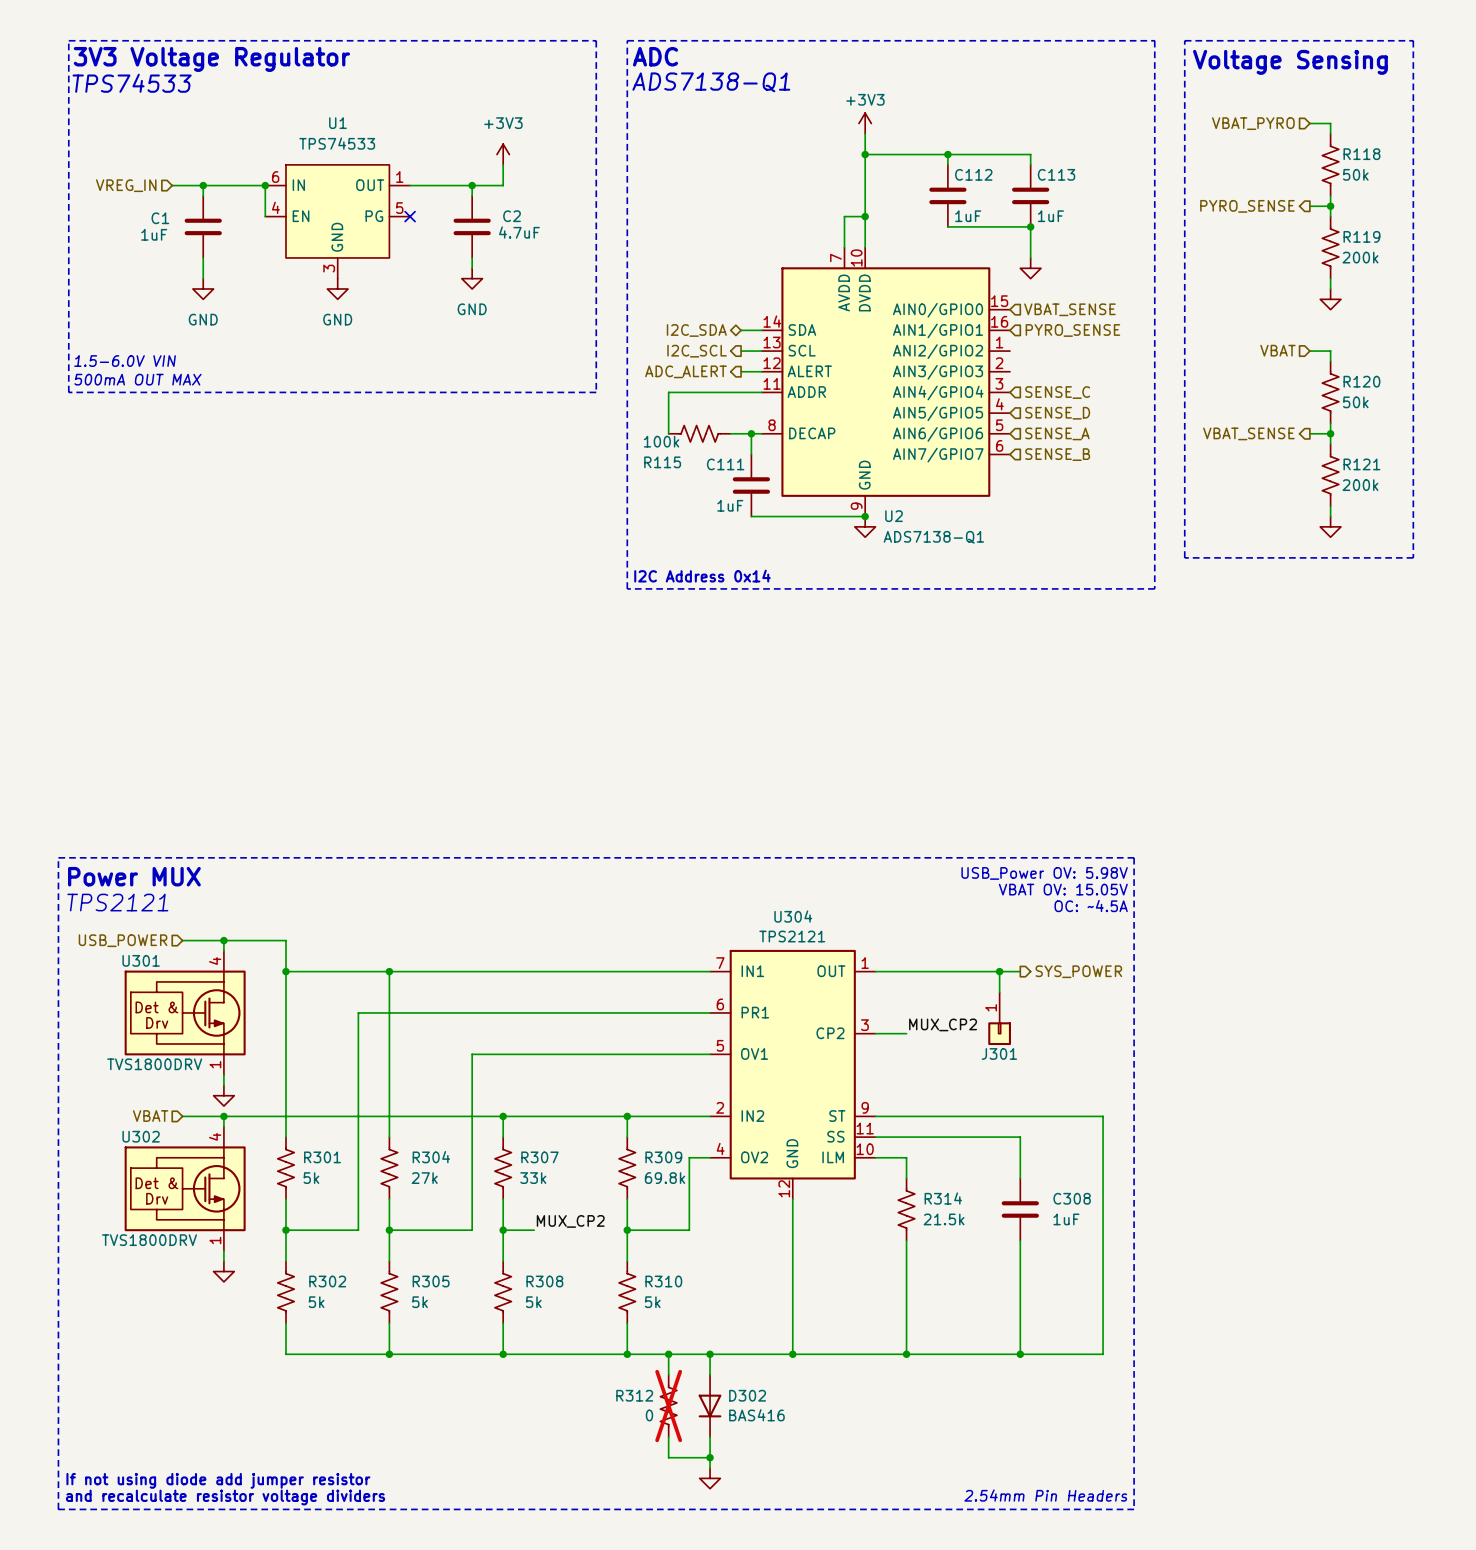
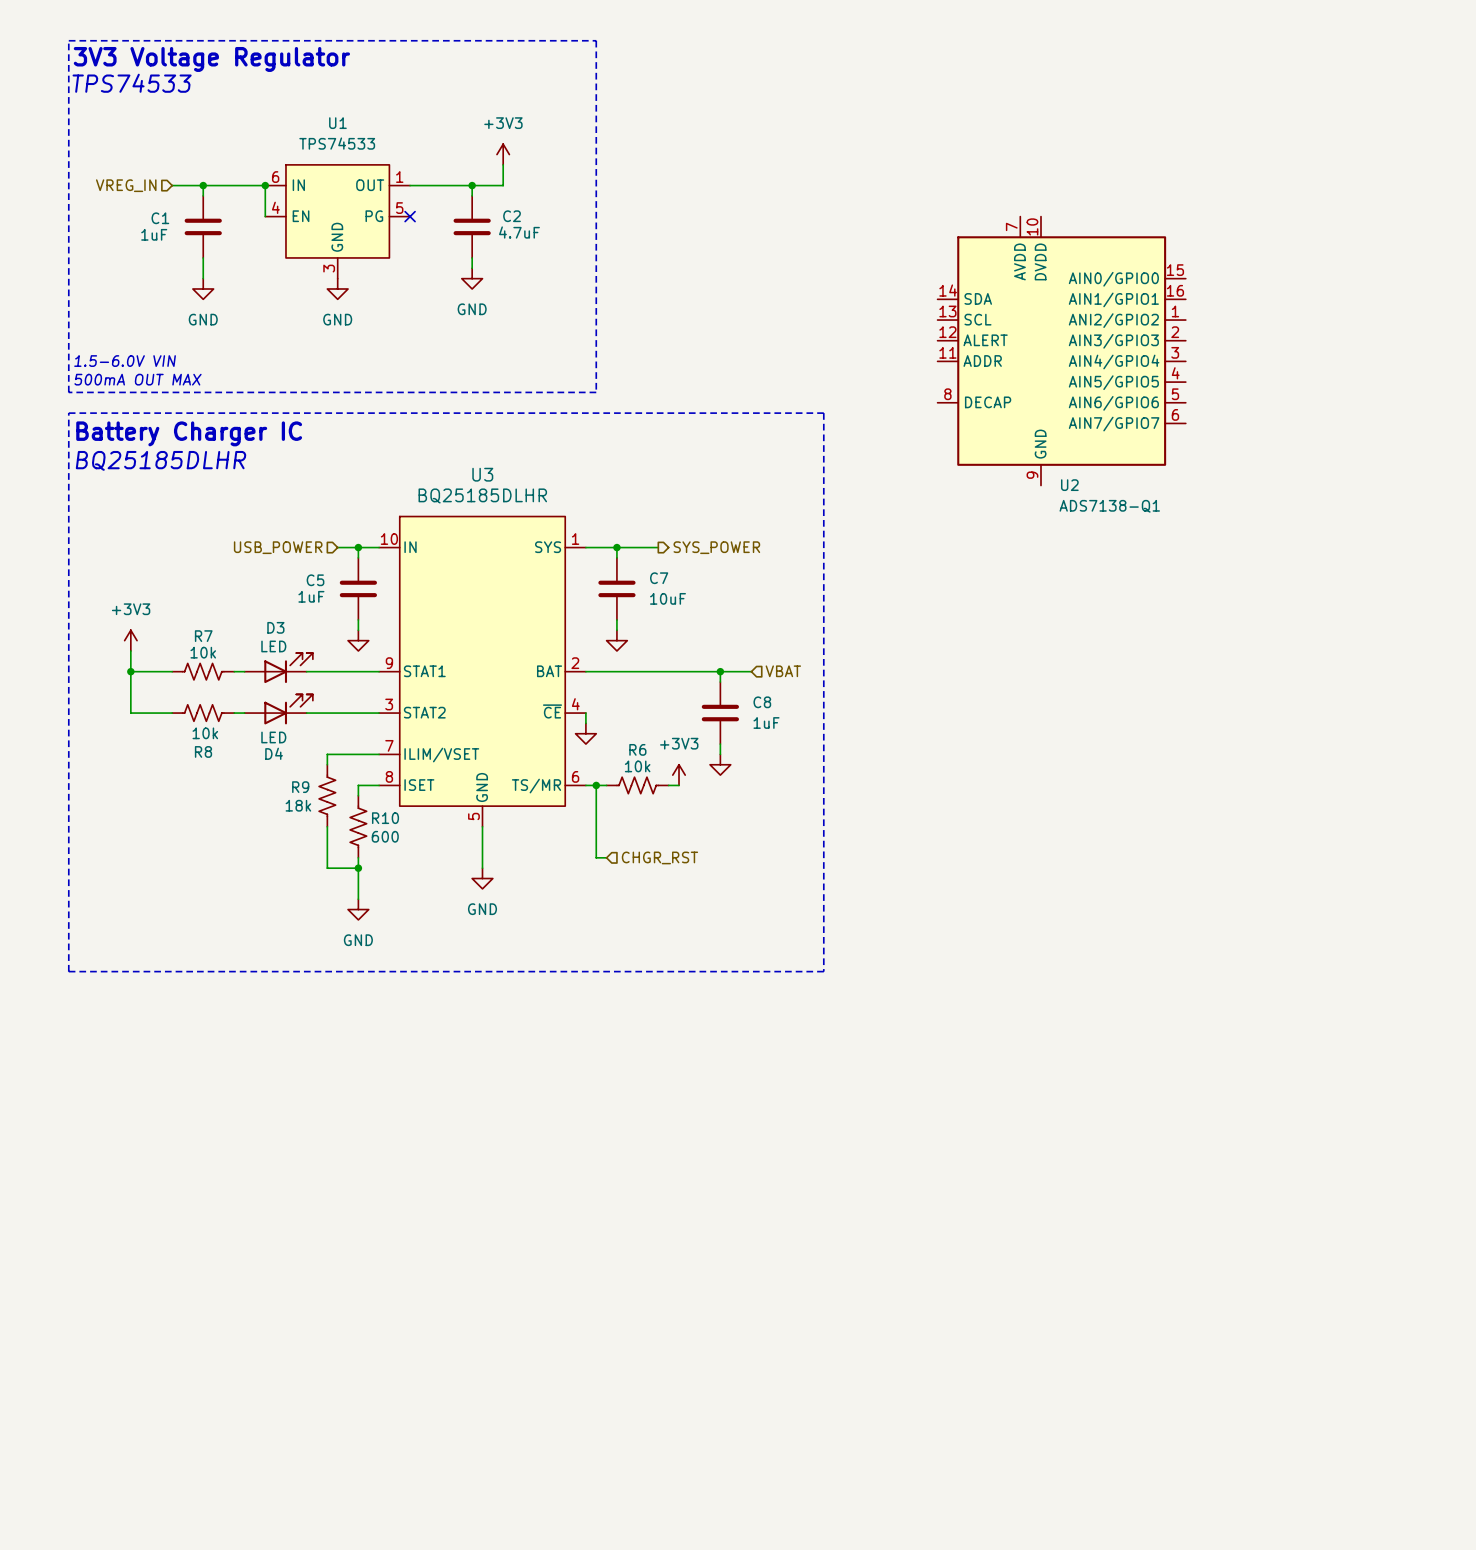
line: (627, 40) (1154, 40) (1154, 588) (627, 588) (627, 40) -> none
line: (1184, 40) (1413, 40) (1413, 557) (1184, 557) (1184, 40) -> none
text: ADC (655, 56) -> none
text: Voltage Sensing (1290, 62) -> none
text: ADS7138-Q1 (711, 82) -> none
power symbol: +3V3 (865, 123) -> none
hierarchical label: VBAT_PYRO (1253, 123) -> none
wire: (1309, 123) (1330, 123) (1330, 133) -> none
wire: (865, 133) (865, 247) -> none
wire: (865, 154) (1030, 154) (1030, 164) -> none
junction: (865, 154) -> none
wire: (947, 154) (947, 164) -> none
junction: (947, 154) -> none
R118: 50k (1330, 164) -> none
C112: 1uF (947, 195) -> none
C113: 1uF (1030, 195) -> none
wire: (1330, 195) (1330, 216) -> none
hierarchical label: PYRO_SENSE (1247, 206) -> none
wire: (1309, 206) (1330, 206) -> none
junction: (1330, 206) -> none
wire: (865, 216) (844, 216) (844, 247) -> none
junction: (865, 216) -> none
wire: (947, 226) (1030, 226) (1030, 257) -> none
junction: (1030, 226) -> none
R119: 200k (1330, 247) -> none
power symbol: (1030, 268) -> none
wire: (1330, 278) (1330, 289) -> none
power symbol: (1330, 299) -> none
hierarchical label: VBAT_SENSE (1069, 309) -> none
hierarchical label: I2C_SDA (696, 330) -> none
wire: (741, 330) (761, 330) -> none
hierarchical label: PYRO_SENSE (1072, 330) -> none
hierarchical label: VBAT (1277, 350) -> none
hierarchical label: I2C_SCL (697, 351) -> none
wire: (741, 351) (761, 351) -> none
wire: (1309, 351) (1330, 351) (1330, 361) -> none
hierarchical label: ADC_ALERT (685, 371) -> none
wire: (741, 371) (761, 371) -> none
U2 position: (885, 382) -> (1061, 351)
wire: (761, 392) (668, 392) (668, 433) -> none
hierarchical label: SENSE_C (1057, 392) -> none
R120: 50k (1330, 392) -> none
line: none -> (68, 413) (823, 413) (823, 971) (68, 971) (68, 413)
hierarchical label: SENSE_D (1057, 413) -> none
wire: (1330, 423) (1330, 444) -> none
text: none -> Battery Charger IC (189, 433)
R115: 100k (699, 433) -> none
wire: (730, 433) (761, 433) -> none
wire: (751, 433) (751, 454) -> none
junction: (751, 433) -> none
hierarchical label: SENSE_A (1057, 433) -> none
hierarchical label: VBAT_SENSE (1248, 433) -> none
wire: (1309, 433) (1330, 433) -> none
junction: (1330, 433) -> none
hierarchical label: SENSE_B (1057, 454) -> none
text: none -> BQ25185DLHR (161, 460)
R121: 200k (1330, 475) -> none
C111: 1uF (751, 485) -> none
wire: (1330, 506) (1330, 516) -> none
wire: (751, 516) (865, 516) -> none
junction: (865, 516) -> none
power symbol: (865, 526) -> none
power symbol: (1330, 526) -> none
hierarchical label: none -> USB_POWER (278, 547)
wire: none -> (337, 547) (379, 547)
wire: none -> (358, 547) (358, 557)
junction: none -> (358, 547)
wire: none -> (585, 547) (658, 547)
wire: none -> (616, 547) (616, 557)
junction: none -> (616, 547)
hierarchical label: none -> SYS_POWER (716, 547)
text: I2C Address 0x14 (702, 576) -> none
C5: none -> 1uF (358, 588)
C7: none -> 10uF (616, 588)
wire: none -> (358, 619) (358, 630)
wire: none -> (616, 619) (616, 630)
power symbol: none -> +3V3 (130, 640)
power symbol: none -> (358, 640)
power symbol: none -> (616, 640)
wire: none -> (130, 650) (130, 713) (172, 713)
D3: none -> LED (278, 668)
wire: none -> (130, 671) (172, 671)
junction: none -> (130, 671)
R7: none -> 10k (203, 671)
wire: none -> (234, 671) (244, 671)
wire: none -> (306, 671) (379, 671)
U3: none -> BQ25185DLHR (482, 671)
wire: none -> (585, 671) (751, 671)
wire: none -> (720, 671) (720, 682)
junction: none -> (720, 671)
hierarchical label: none -> VBAT (783, 671)
D4: none -> LED (278, 709)
R8: none -> 10k (203, 713)
wire: none -> (234, 713) (244, 713)
wire: none -> (306, 713) (379, 713)
wire: none -> (585, 713) (585, 723)
C8: none -> 1uF (720, 713)
power symbol: none -> (585, 733)
wire: none -> (720, 744) (720, 754)
wire: none -> (379, 754) (327, 754) (327, 764)
power symbol: none -> (720, 764)
power symbol: none -> +3V3 (679, 775)
wire: none -> (379, 785) (358, 785) (358, 795)
wire: none -> (585, 785) (606, 785)
wire: none -> (596, 785) (596, 857) (606, 857)
junction: none -> (596, 785)
R6: none -> 10k (637, 785)
wire: none -> (668, 785) (679, 785)
R9: none -> 18k (327, 795)
wire: none -> (327, 826) (327, 868) (358, 868)
R10: none -> 600 (358, 826)
wire: none -> (482, 826) (482, 868)
line: (58, 857) (1134, 857) (1134, 1509) (58, 1509) (58, 857) -> none
wire: none -> (358, 857) (358, 899)
hierarchical label: none -> CHGR_RST (659, 857)
junction: none -> (358, 868)
text: USB_Power OV: 5.98V (1044, 873) -> none
text: Power MUX (134, 876) -> none
power symbol: none -> GND (482, 878)
text: VBAT OV: 15.05V (1063, 889) -> none
text: TPS2121 (117, 902) -> none
text: OC: ~4.5A (1091, 906) -> none
power symbol: none -> GND (358, 909)
hierarchical label: USB_POWER (123, 940) -> none
wire: (182, 940) (285, 940) (285, 1137) -> none
wire: (223, 940) (223, 950) -> none
junction: (223, 940) -> none
junction: (285, 971) -> none
wire: (389, 971) (389, 1137) -> none
junction: (389, 971) -> none
wire: (875, 971) (1020, 971) -> none
wire: (999, 971) (999, 992) -> none
junction: (999, 971) -> none
hierarchical label: SYS_POWER (1078, 971) -> none
U301: TVS1800DRV (185, 1012) -> none
wire: (710, 1012) (358, 1012) (358, 1230) (285, 1230) -> none
J301: (999, 1018) -> none
label: MUX_CP2 (943, 1024) -> none
wire: (875, 1033) (906, 1033) -> none
wire: (710, 1054) (472, 1054) (472, 1230) (389, 1230) -> none
U304: TPS2121 (792, 1074) -> none
wire: (223, 1075) (223, 1085) -> none
power symbol: (223, 1095) -> none
hierarchical label: VBAT (150, 1116) -> none
wire: (182, 1116) (710, 1116) -> none
wire: (223, 1116) (223, 1126) -> none
junction: (223, 1116) -> none
wire: (503, 1116) (503, 1137) -> none
junction: (503, 1116) -> none
wire: (627, 1116) (627, 1137) -> none
junction: (627, 1116) -> none
wire: (875, 1116) (1103, 1116) (1103, 1354) (285, 1354) (285, 1323) -> none
wire: (875, 1137) (1020, 1137) (1020, 1178) -> none
wire: (710, 1157) (689, 1157) (689, 1230) (627, 1230) -> none
wire: (875, 1157) (906, 1157) (906, 1178) -> none
R301: 5k (285, 1168) -> none
R304: 27k (389, 1168) -> none
R307: 33k (503, 1168) -> none
R309: 69.8k (627, 1168) -> none
U302: TVS1800DRV (185, 1188) -> none
wire: (285, 1199) (285, 1261) -> none
wire: (389, 1199) (389, 1261) -> none
wire: (503, 1199) (503, 1261) -> none
wire: (627, 1199) (627, 1261) -> none
wire: (792, 1199) (792, 1354) -> none
R314: 21.5k (906, 1209) -> none
C308: 1uF (1020, 1209) -> none
label: MUX_CP2 (570, 1221) -> none
junction: (285, 1230) -> none
junction: (389, 1230) -> none
wire: (503, 1230) (534, 1230) -> none
junction: (503, 1230) -> none
junction: (627, 1230) -> none
wire: (906, 1240) (906, 1354) -> none
wire: (1020, 1240) (1020, 1354) -> none
wire: (223, 1250) (223, 1261) -> none
power symbol: (223, 1271) -> none
R302: 5k (285, 1292) -> none
R305: 5k (389, 1292) -> none
R308: 5k (503, 1292) -> none
R310: 5k (627, 1292) -> none
wire: (389, 1323) (389, 1354) -> none
wire: (503, 1323) (503, 1354) -> none
wire: (627, 1323) (627, 1354) -> none
junction: (389, 1354) -> none
junction: (503, 1354) -> none
junction: (627, 1354) -> none
wire: (668, 1354) (668, 1374) -> none
junction: (668, 1354) -> none
wire: (710, 1354) (710, 1374) -> none
junction: (710, 1354) -> none
junction: (792, 1354) -> none
junction: (906, 1354) -> none
junction: (1020, 1354) -> none
R312: 0 (668, 1406) -> none
D302: BAS416 (710, 1406) -> none
wire: (668, 1437) (668, 1457) (710, 1457) -> none
wire: (710, 1437) (710, 1468) -> none
junction: (710, 1457) -> none
power symbol: (710, 1478) -> none
text: If not using diode add jumper resistor (218, 1480) -> none
text: 2.54mm Pin Headers (1045, 1495) -> none
text: and recalculate resistor voltage dividers (225, 1497) -> none

